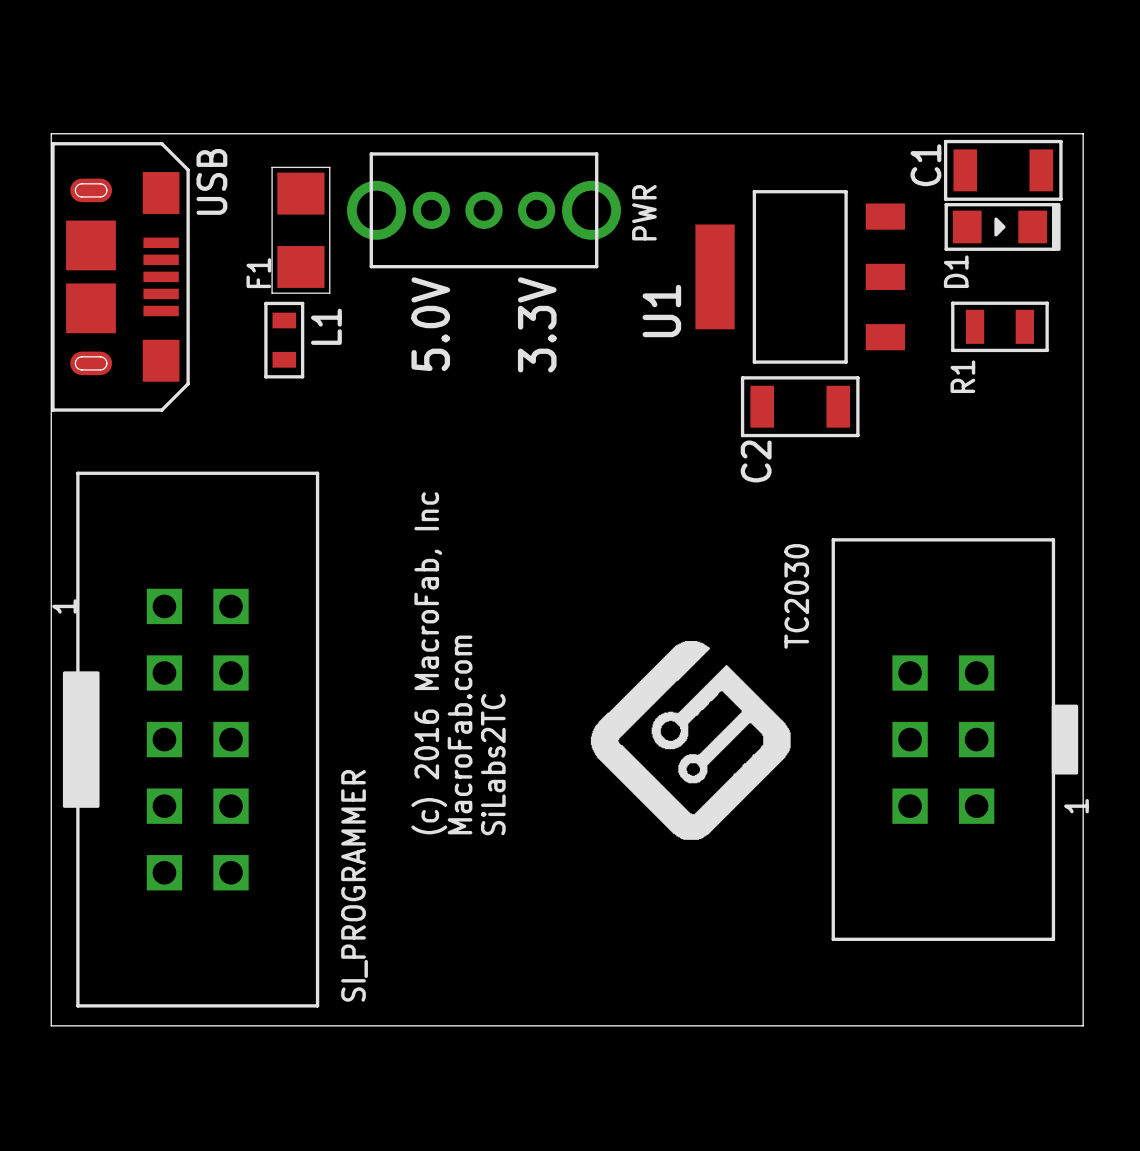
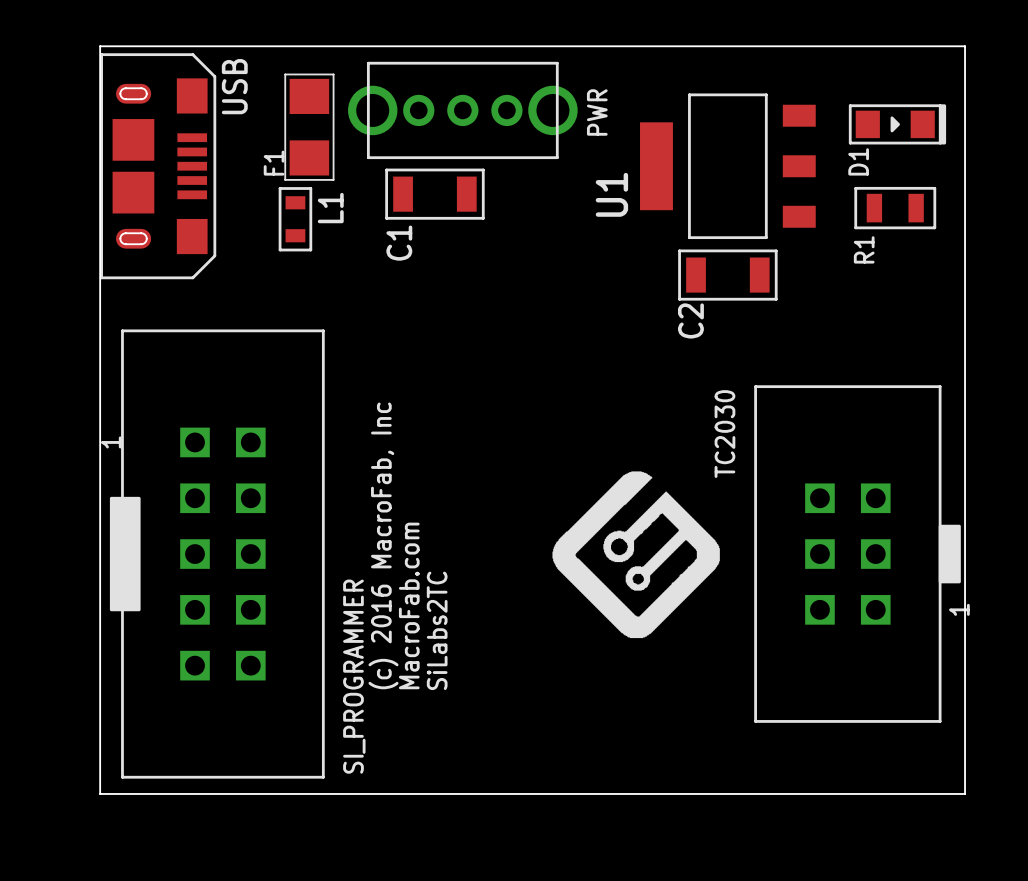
C1 name position: C1 (925, 165) -> C1 (399, 243)
C1 position: (1003, 170) -> (434, 194)
text: 5.0V (430, 324) -> none
text: 3.3V (537, 324) -> none
drawing position: (458, 663) -> (408, 546)

